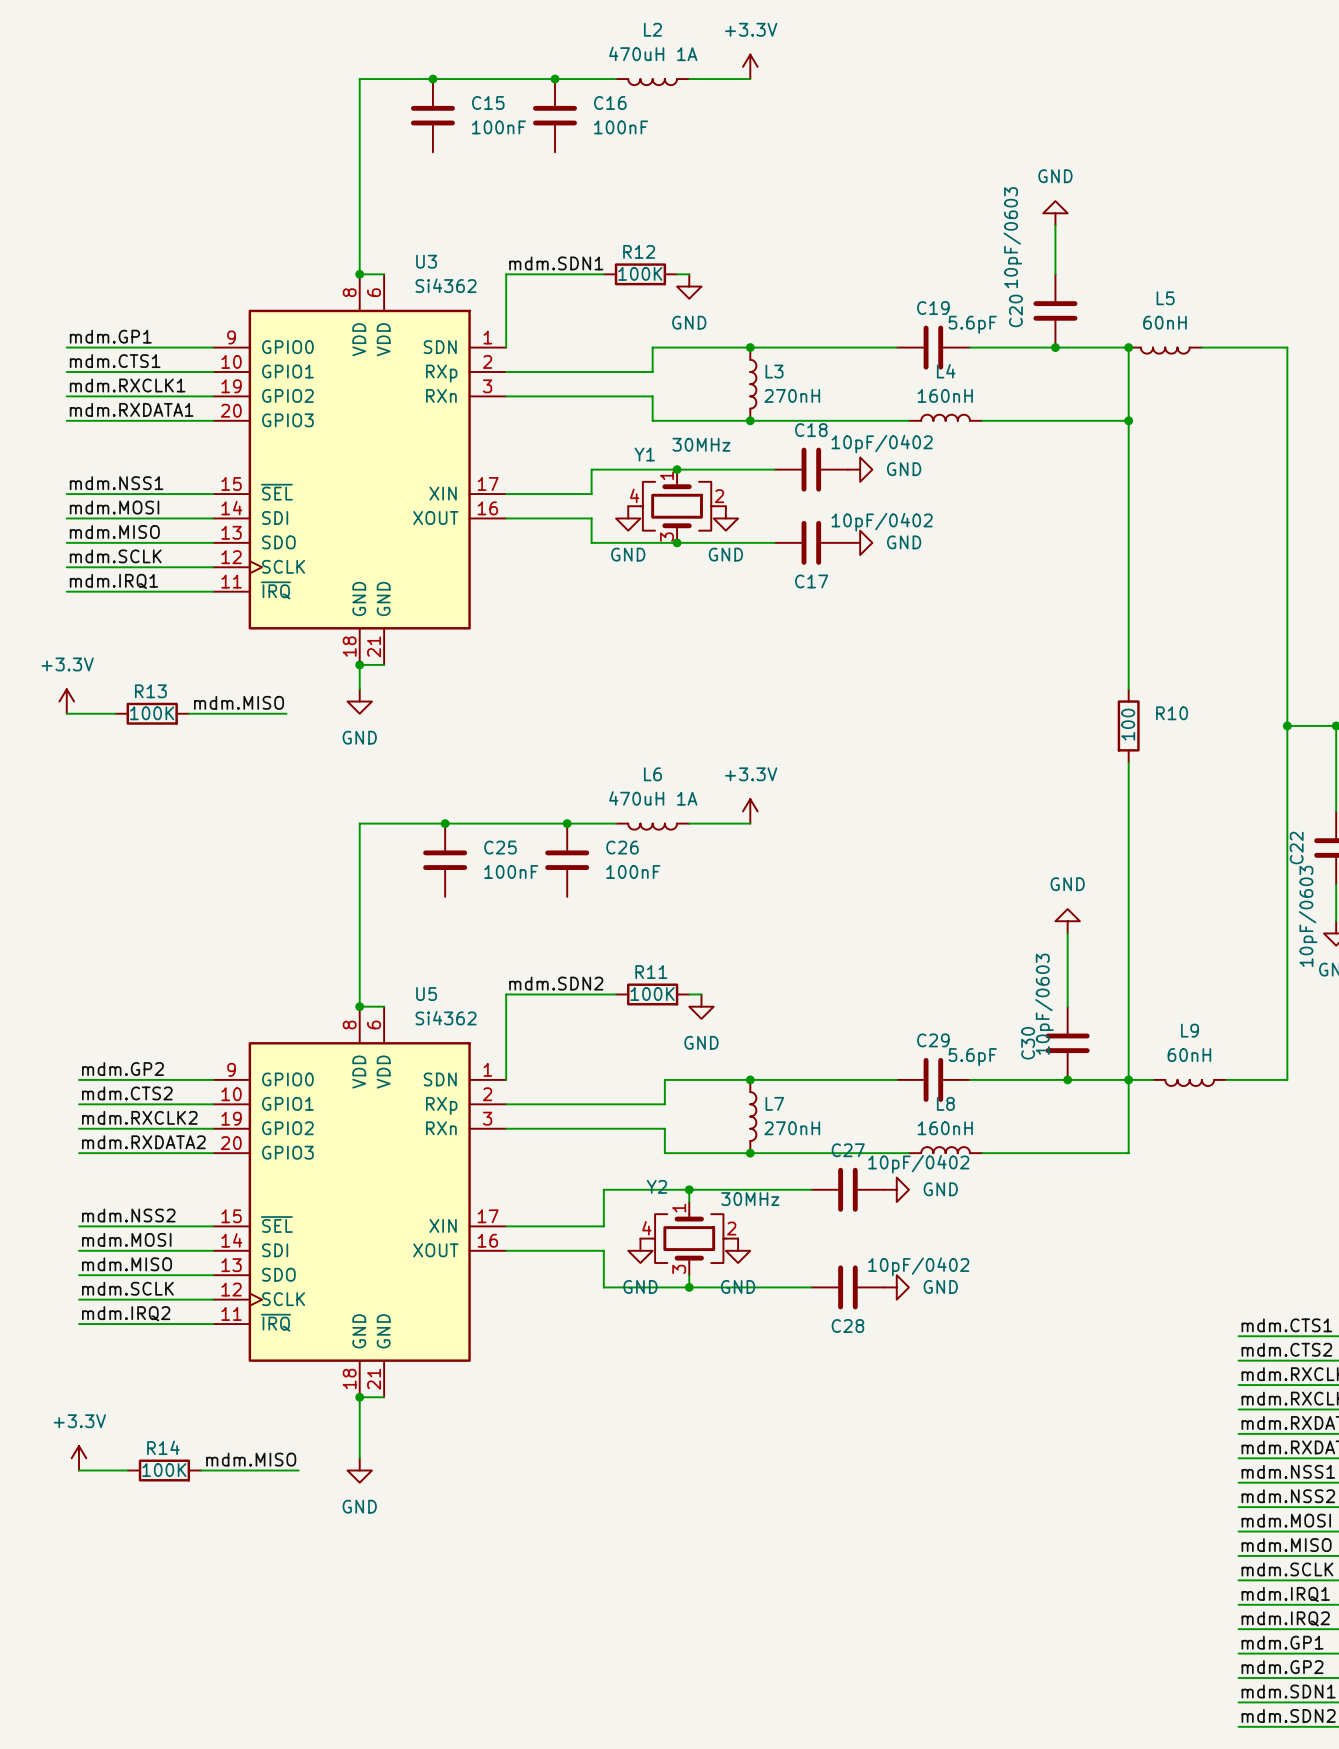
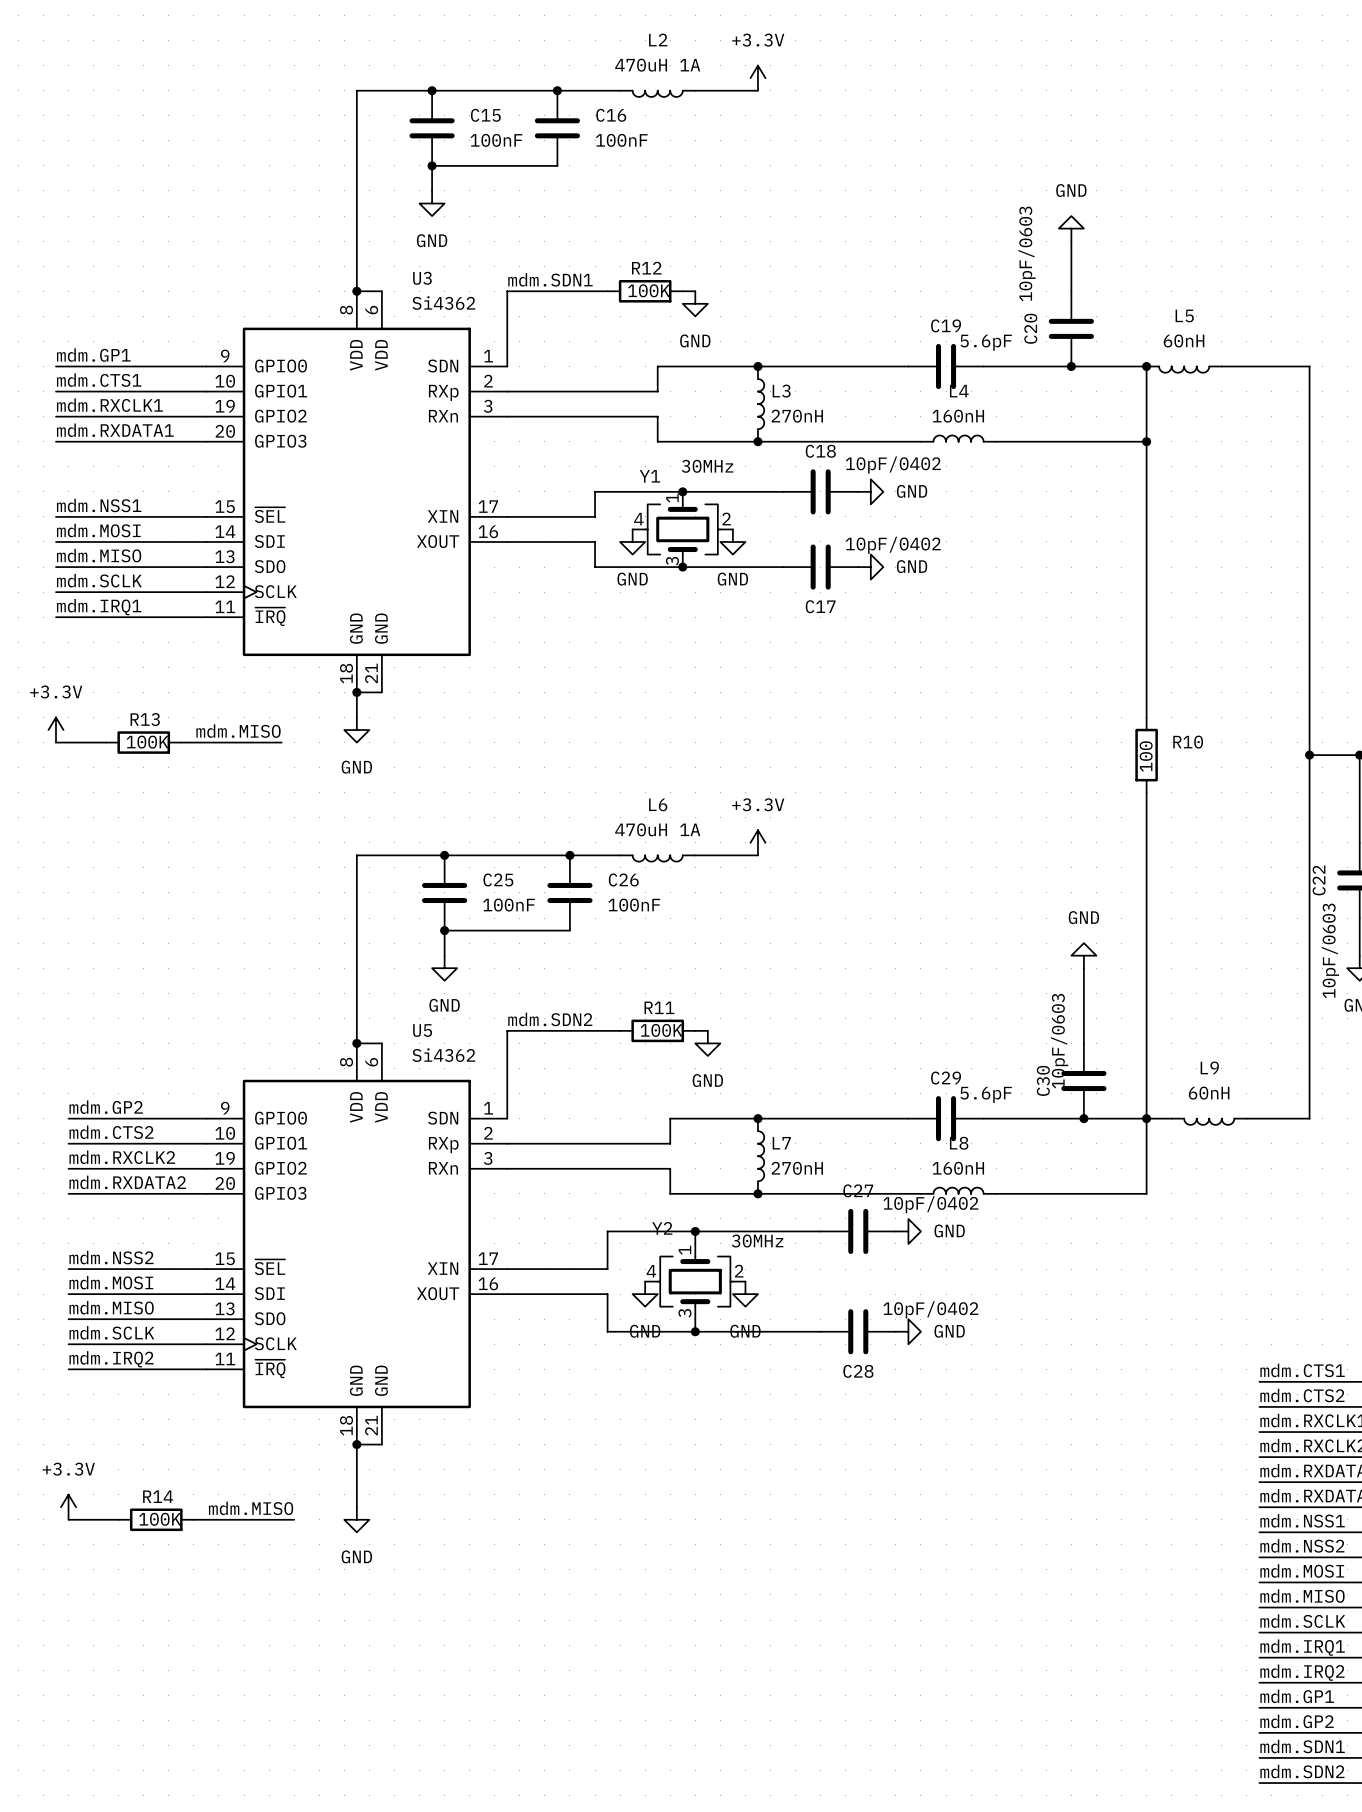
junction: none -> (432, 165)
wire: none -> (557, 165) (432, 165) (432, 190)
power symbol: none -> GND (432, 203)
junction: none -> (444, 930)
wire: none -> (569, 930) (444, 930) (444, 955)
power symbol: none -> GND (444, 968)

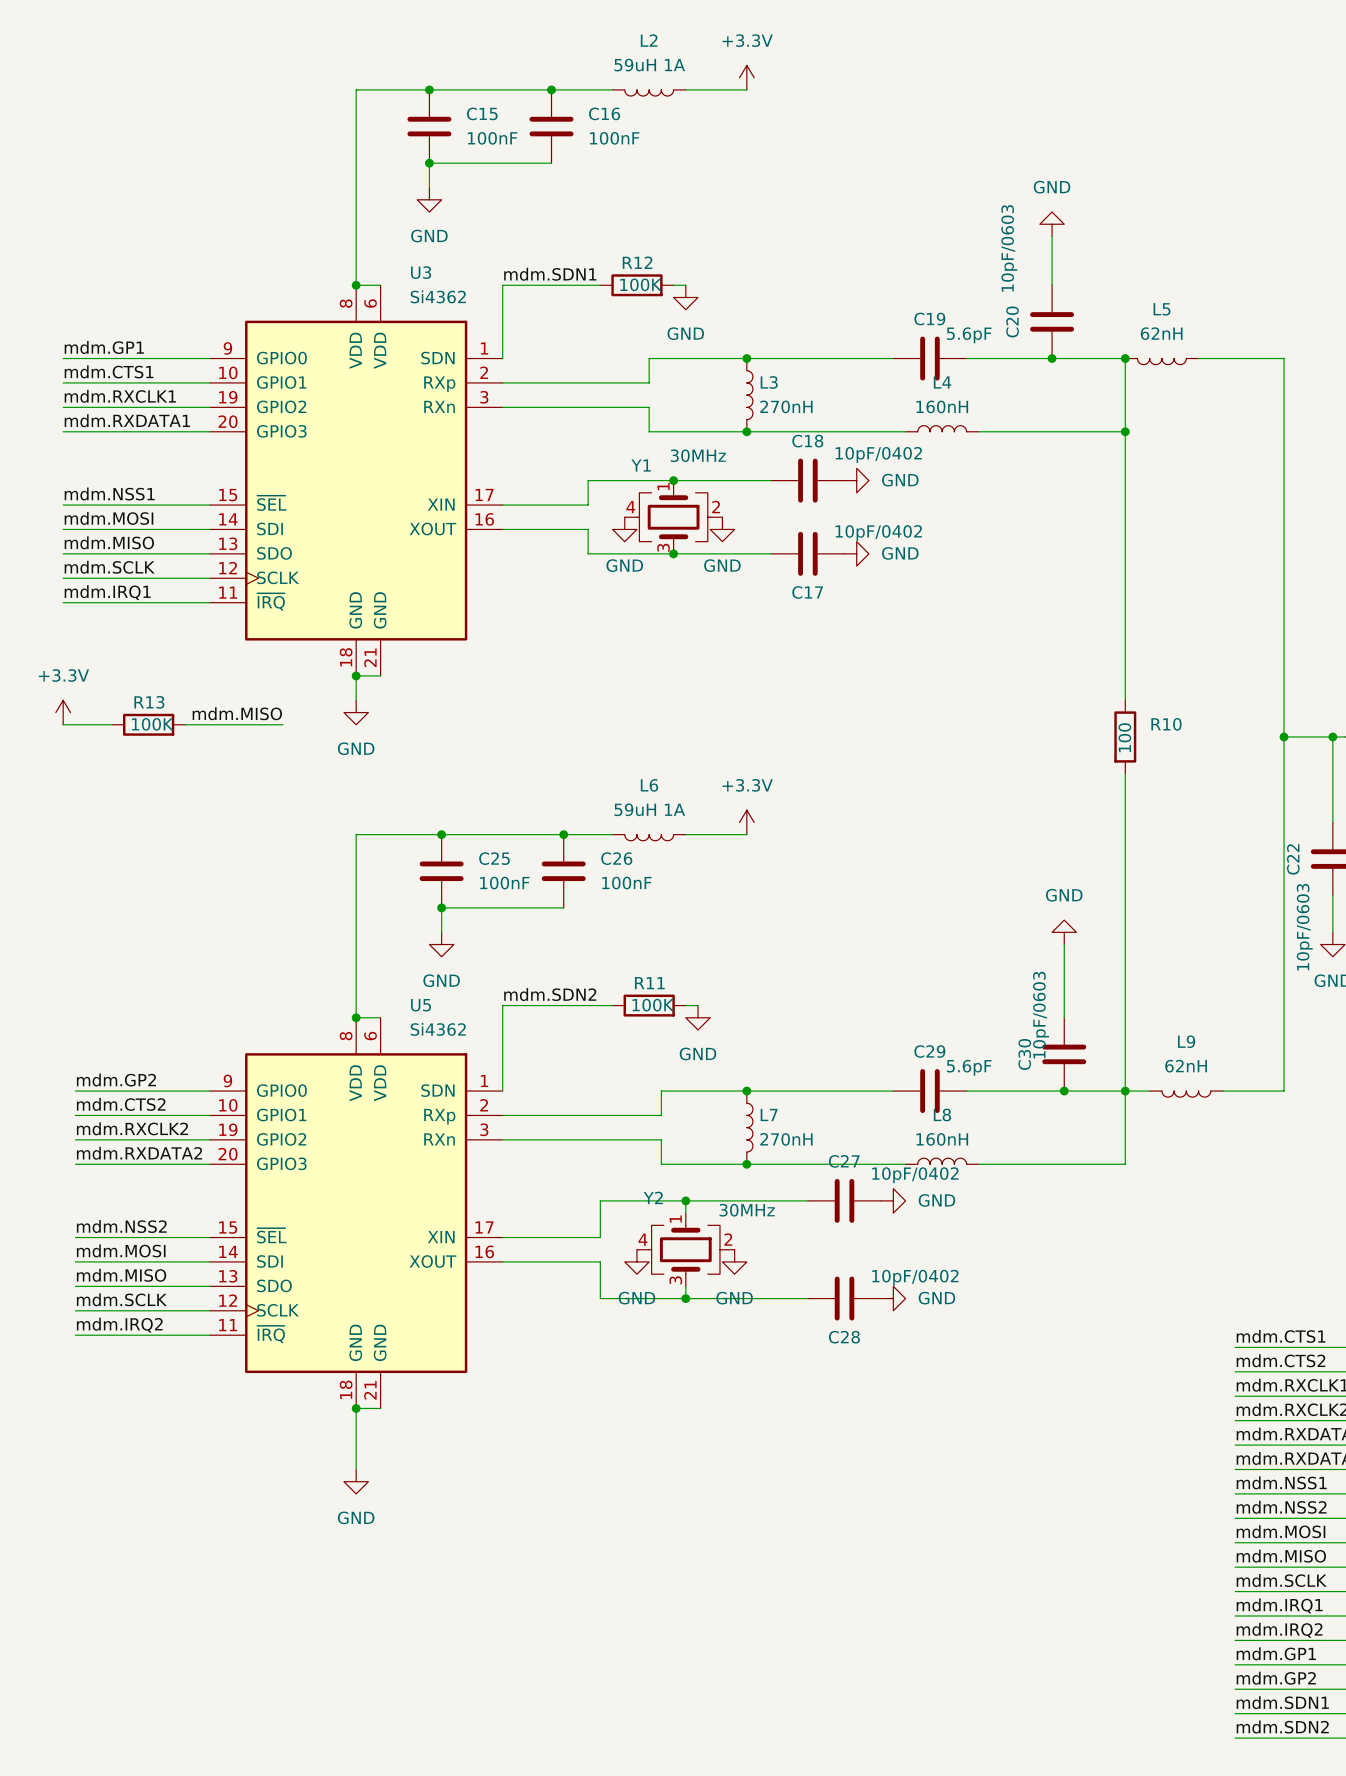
L2 value: 470uH 1A (657, 65) -> 59uH 1A (649, 65)
L5 value: 60nH (1184, 340) -> 62nH (1161, 333)
L6 value: 470uH 1A (657, 829) -> 59uH 1A (649, 809)
L9 value: 60nH (1209, 1093) -> 62nH (1186, 1066)
power symbol: +3.3V (68, 1507) -> none
label: mdm.MISO (251, 1508) -> none
wire: (68, 1519) (118, 1519) -> none
R14: 100K (156, 1519) -> none
wire: (193, 1519) (294, 1519) -> none

